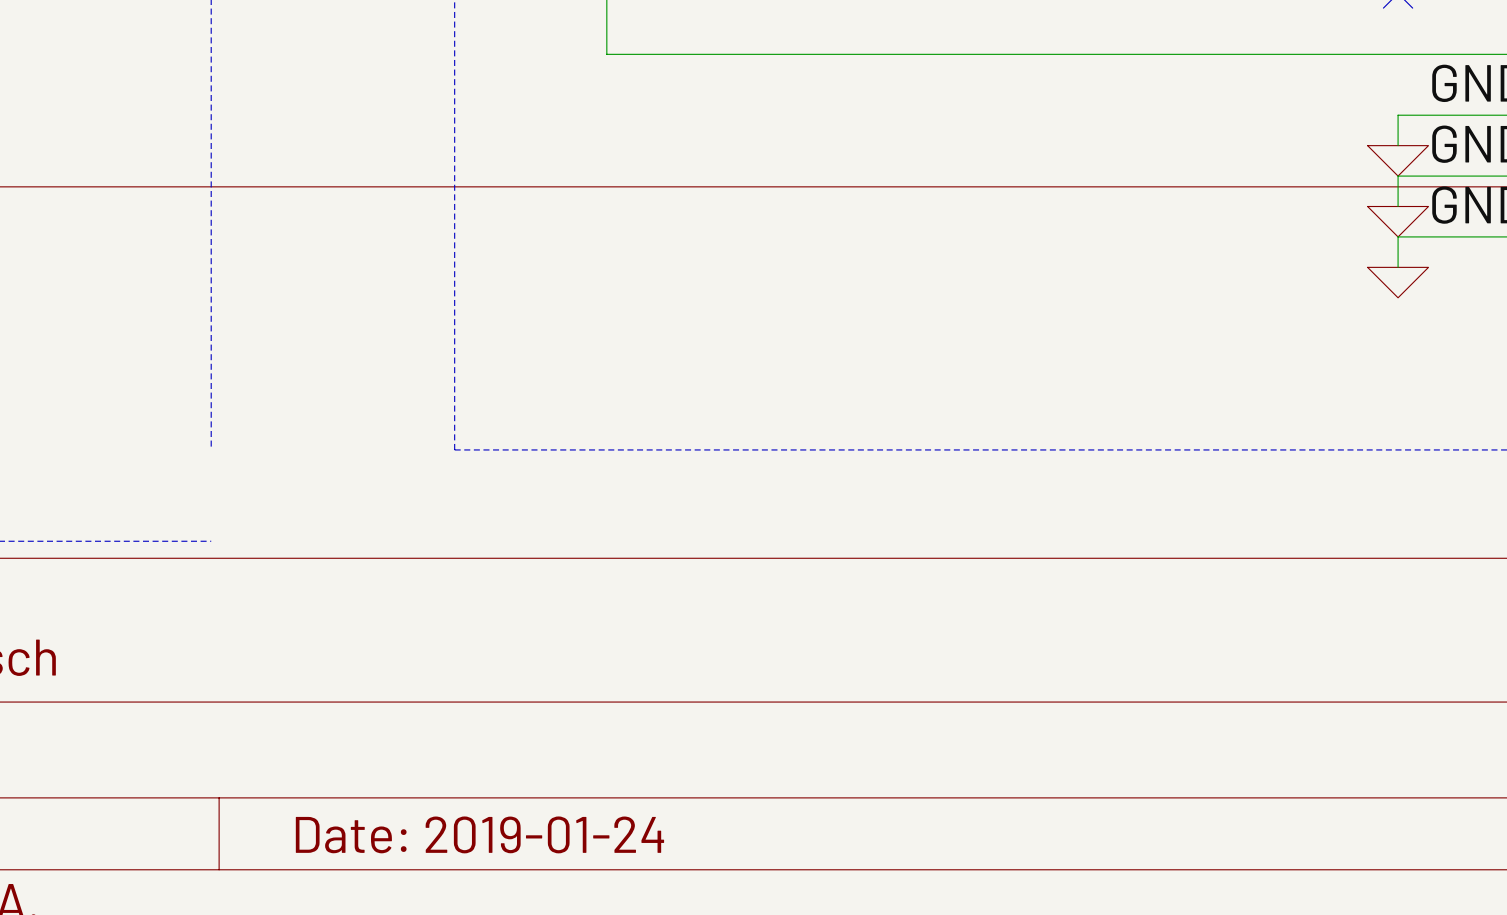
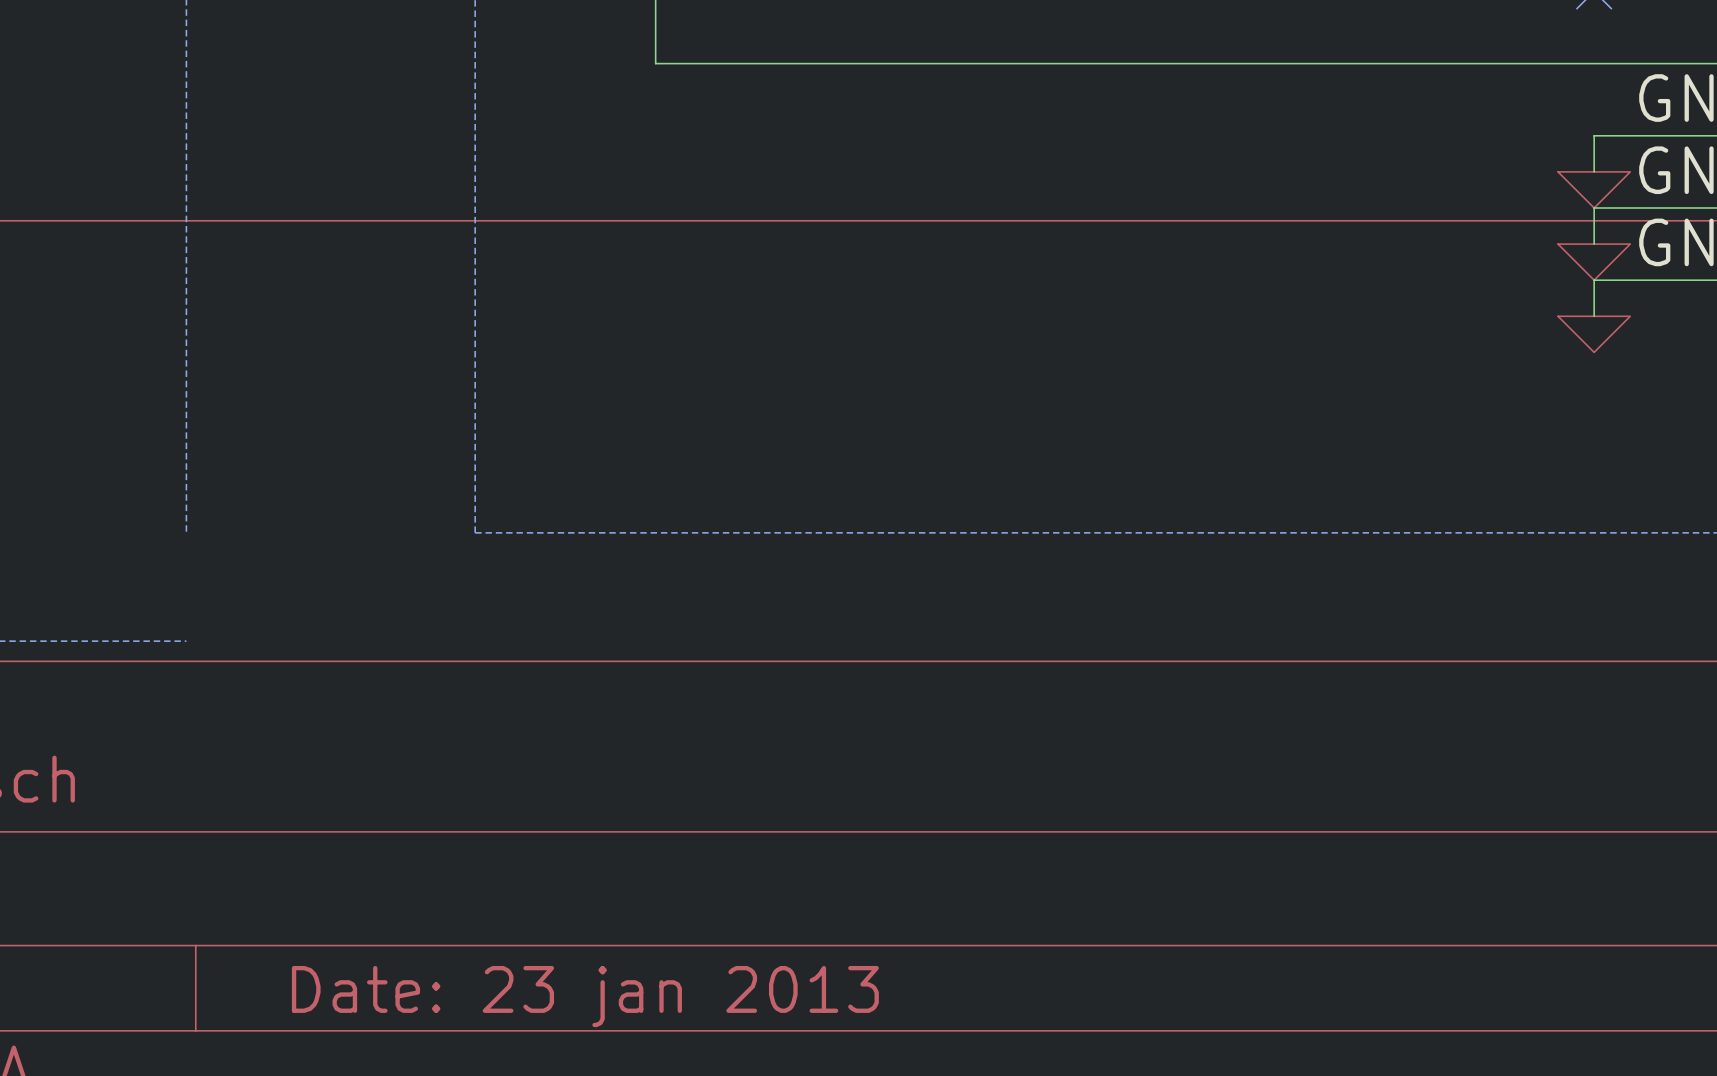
title block: Date: 2019-01-24 (479, 834) -> Date: 23 jan 2013 (585, 996)

